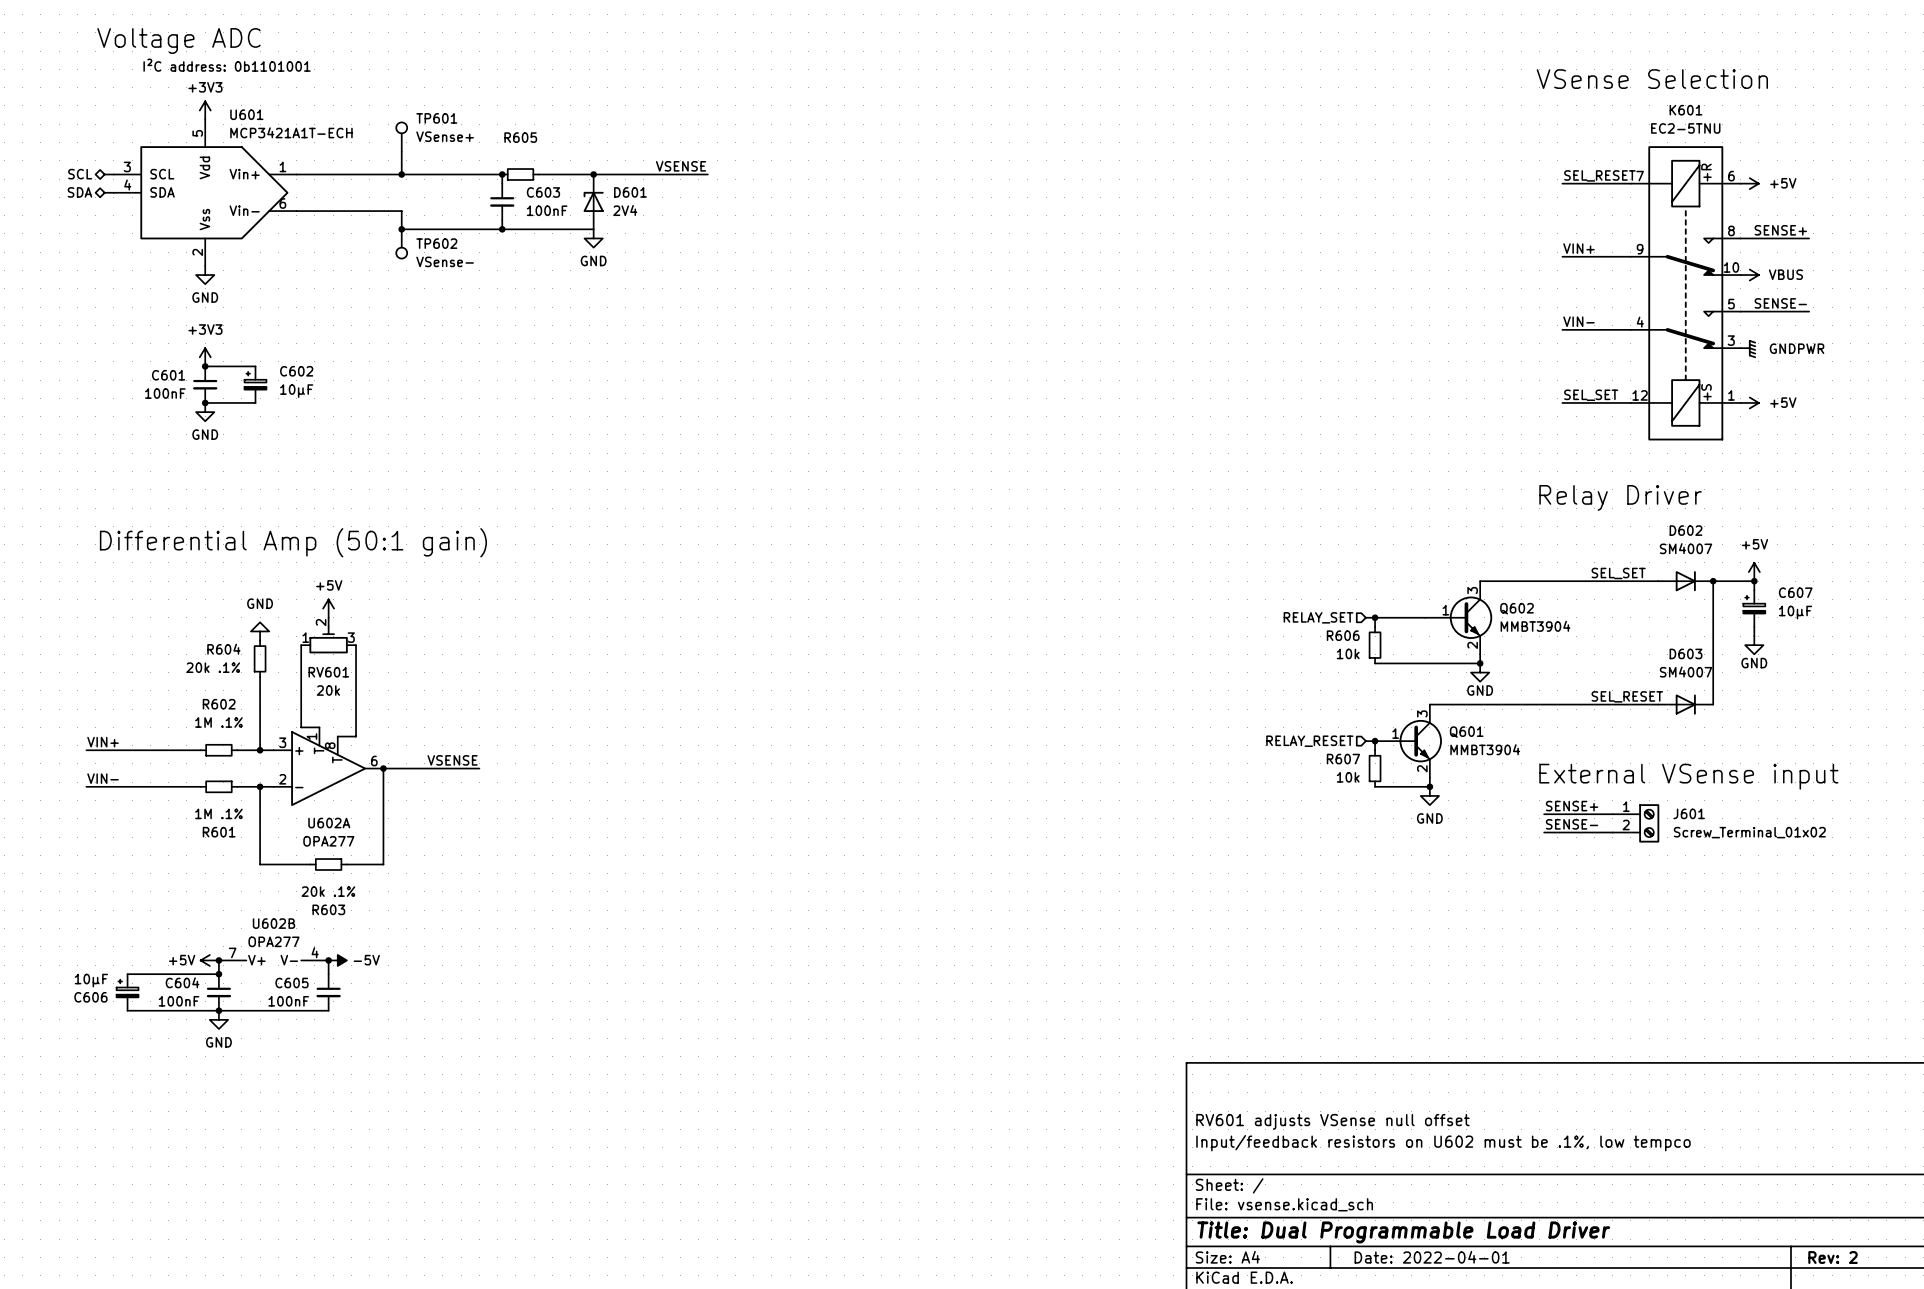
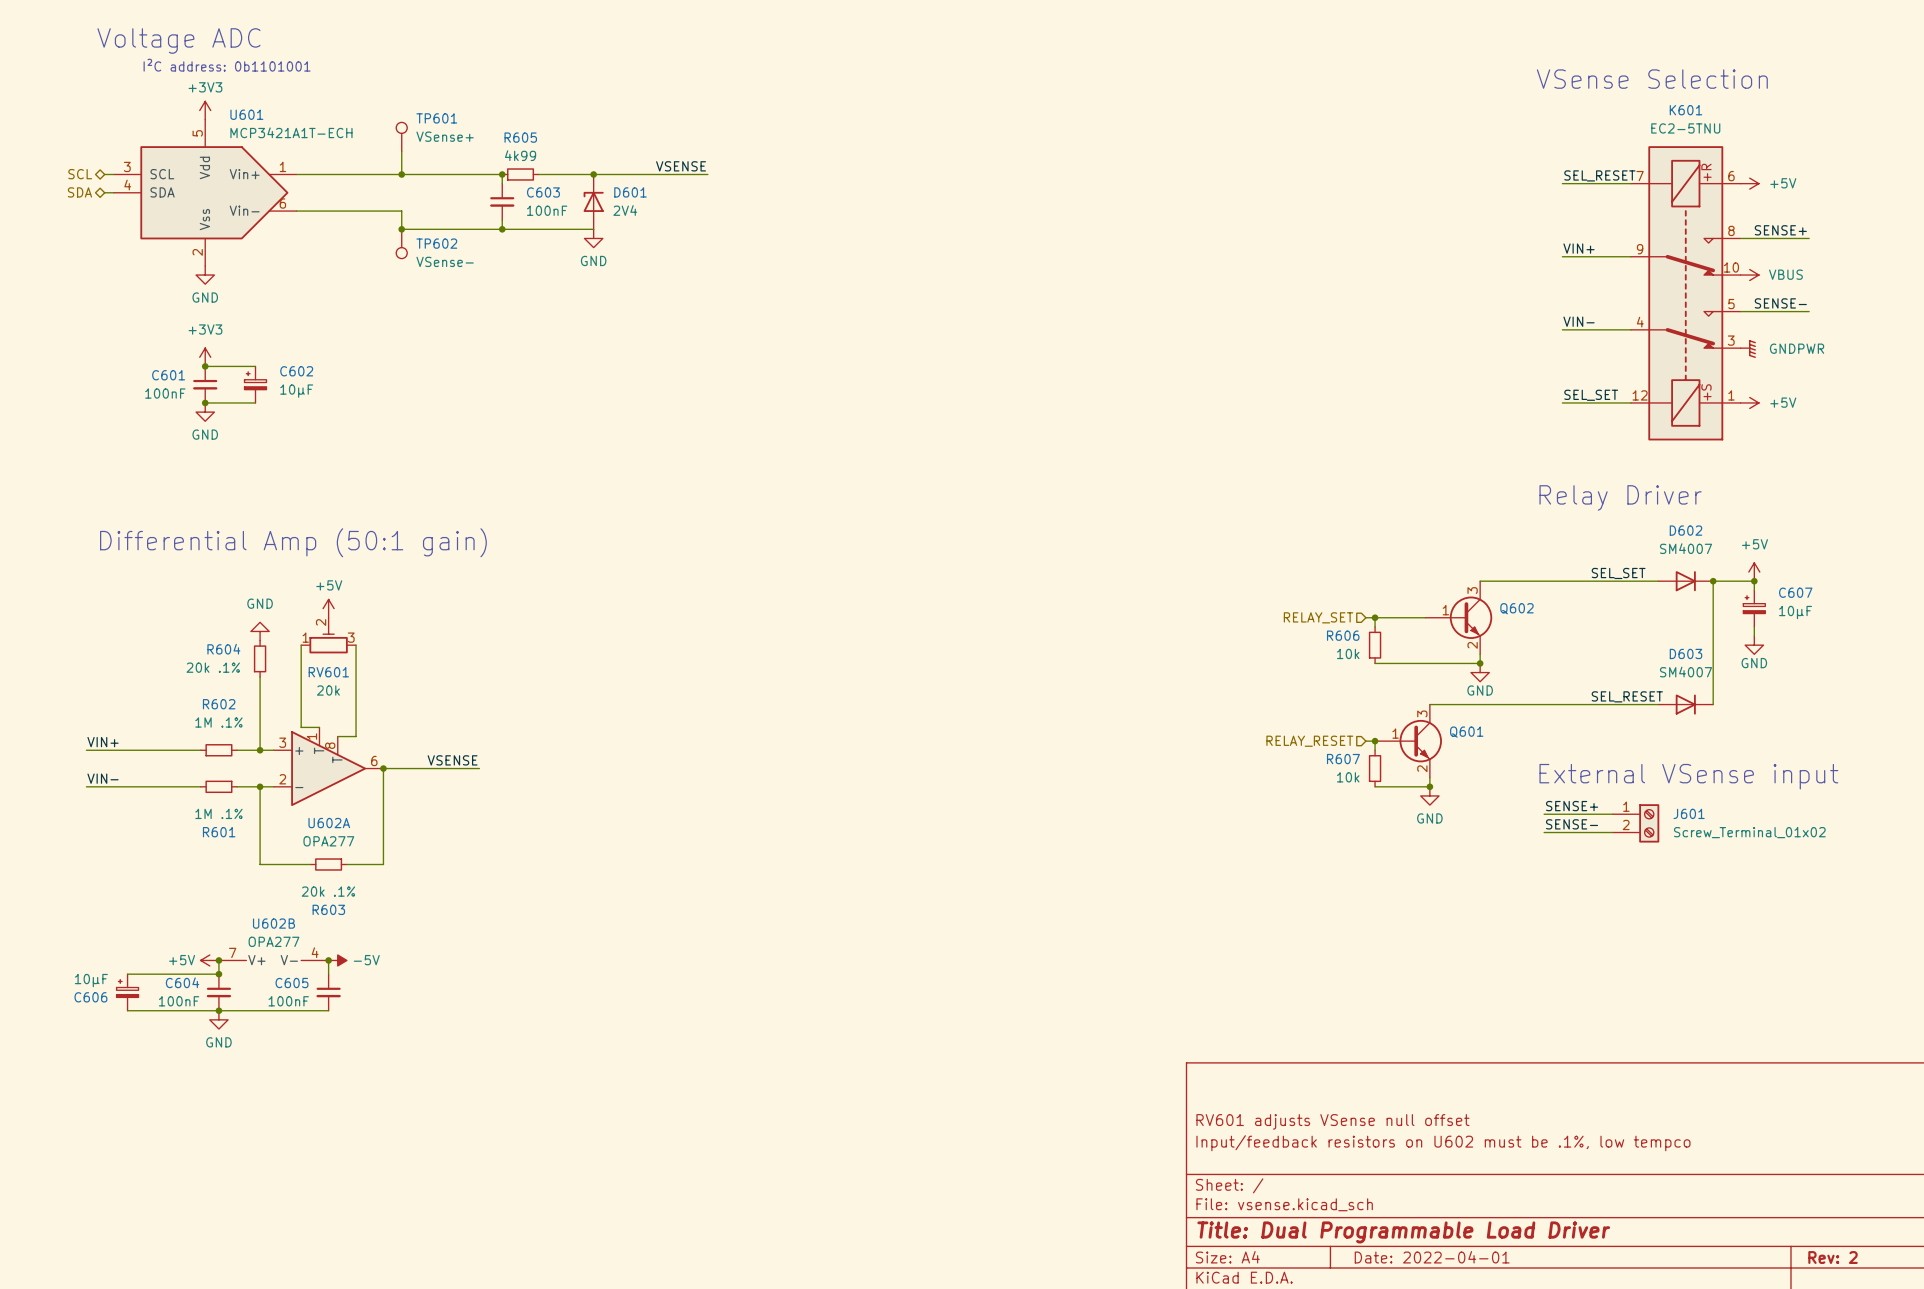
R605 value: none -> 4k99 (520, 155)
Q602 value: MMBT3904 (1535, 626) -> none
Q601 value: MMBT3904 (1485, 749) -> none

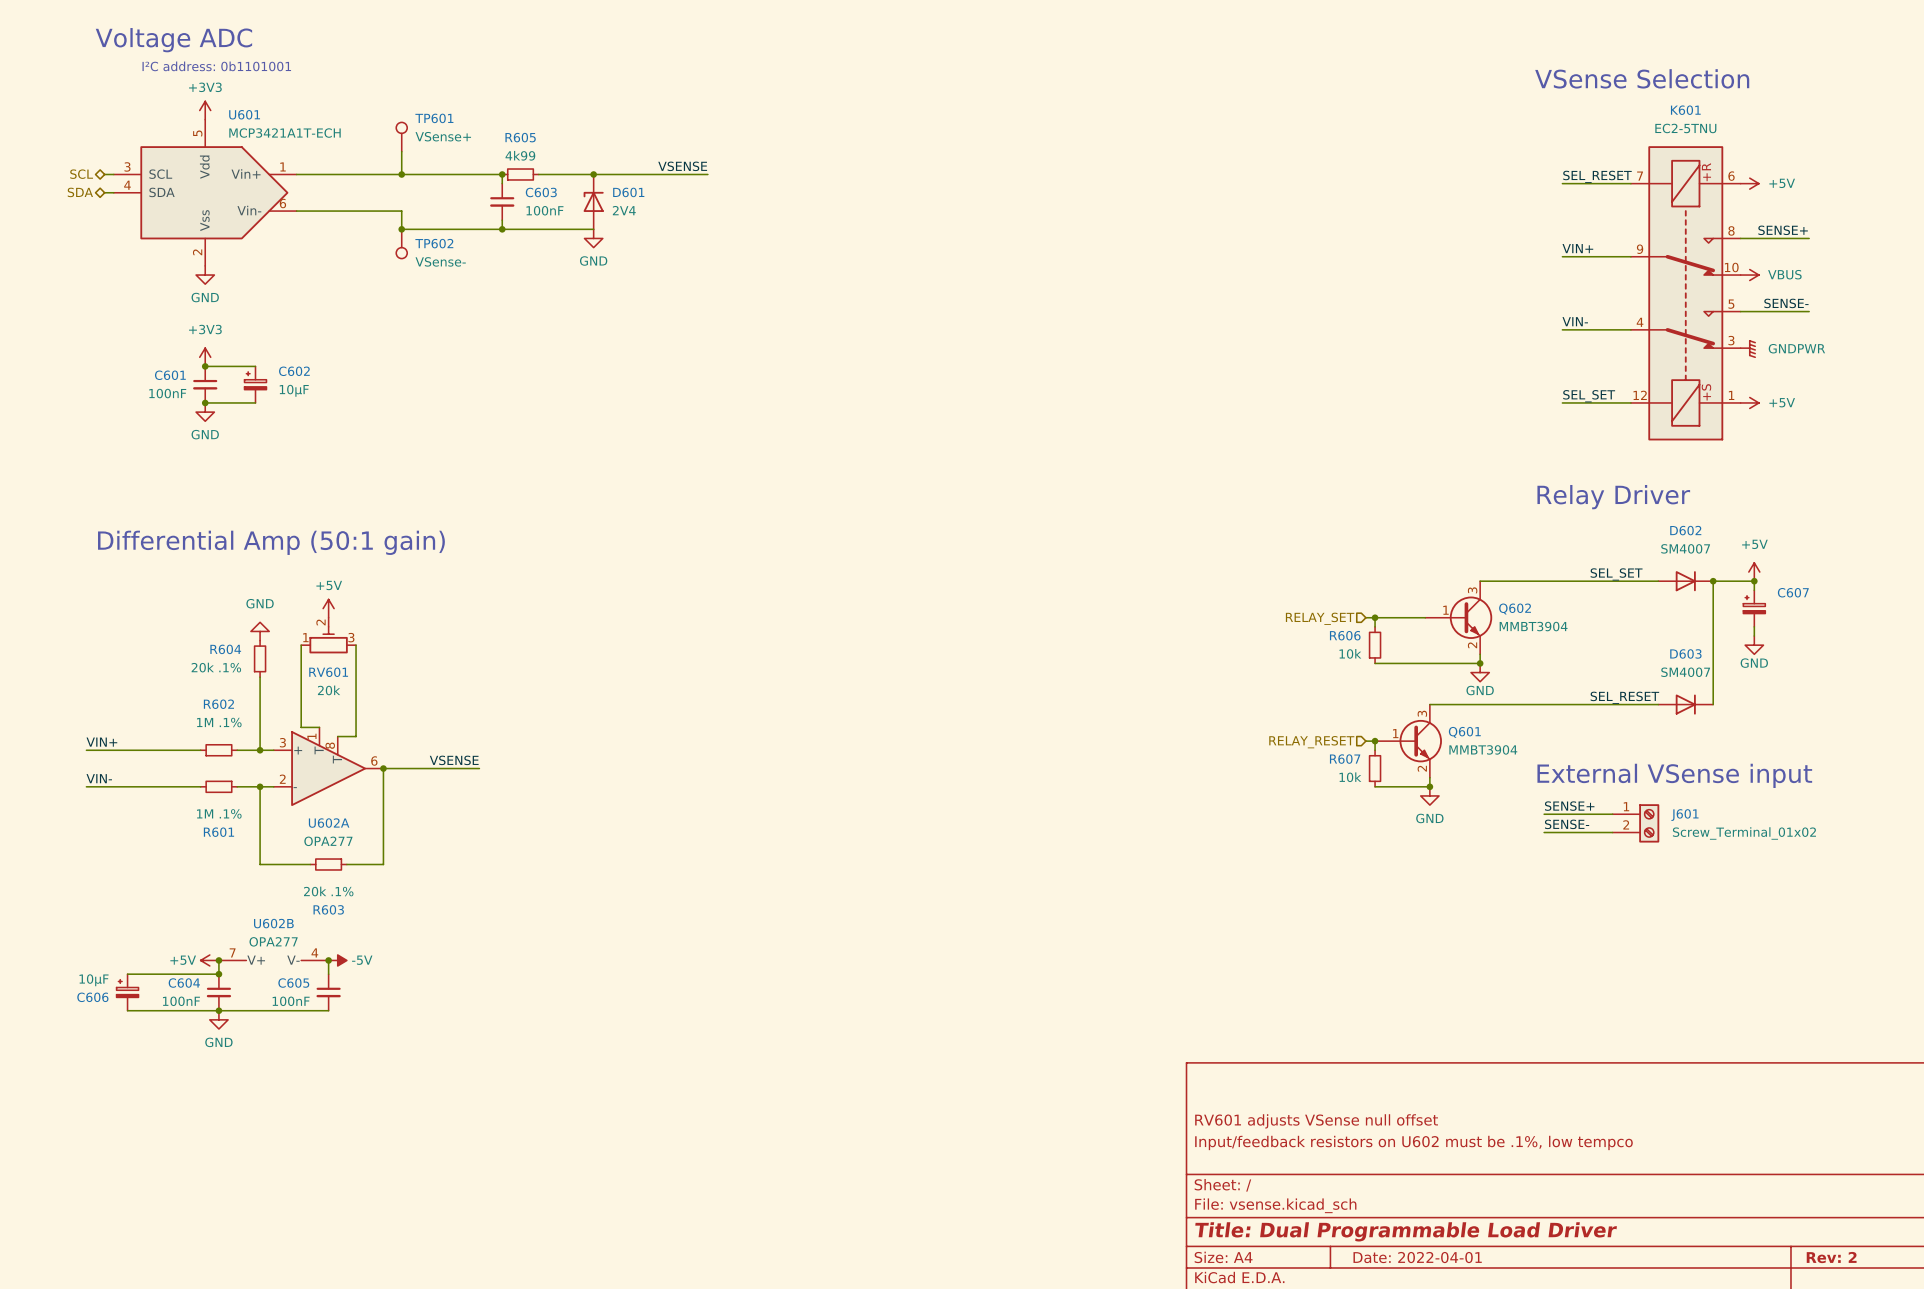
C607 value: 10µF (1795, 612) -> none
Q602 value: none -> MMBT3904 (1533, 626)
Q601 value: none -> MMBT3904 (1483, 749)

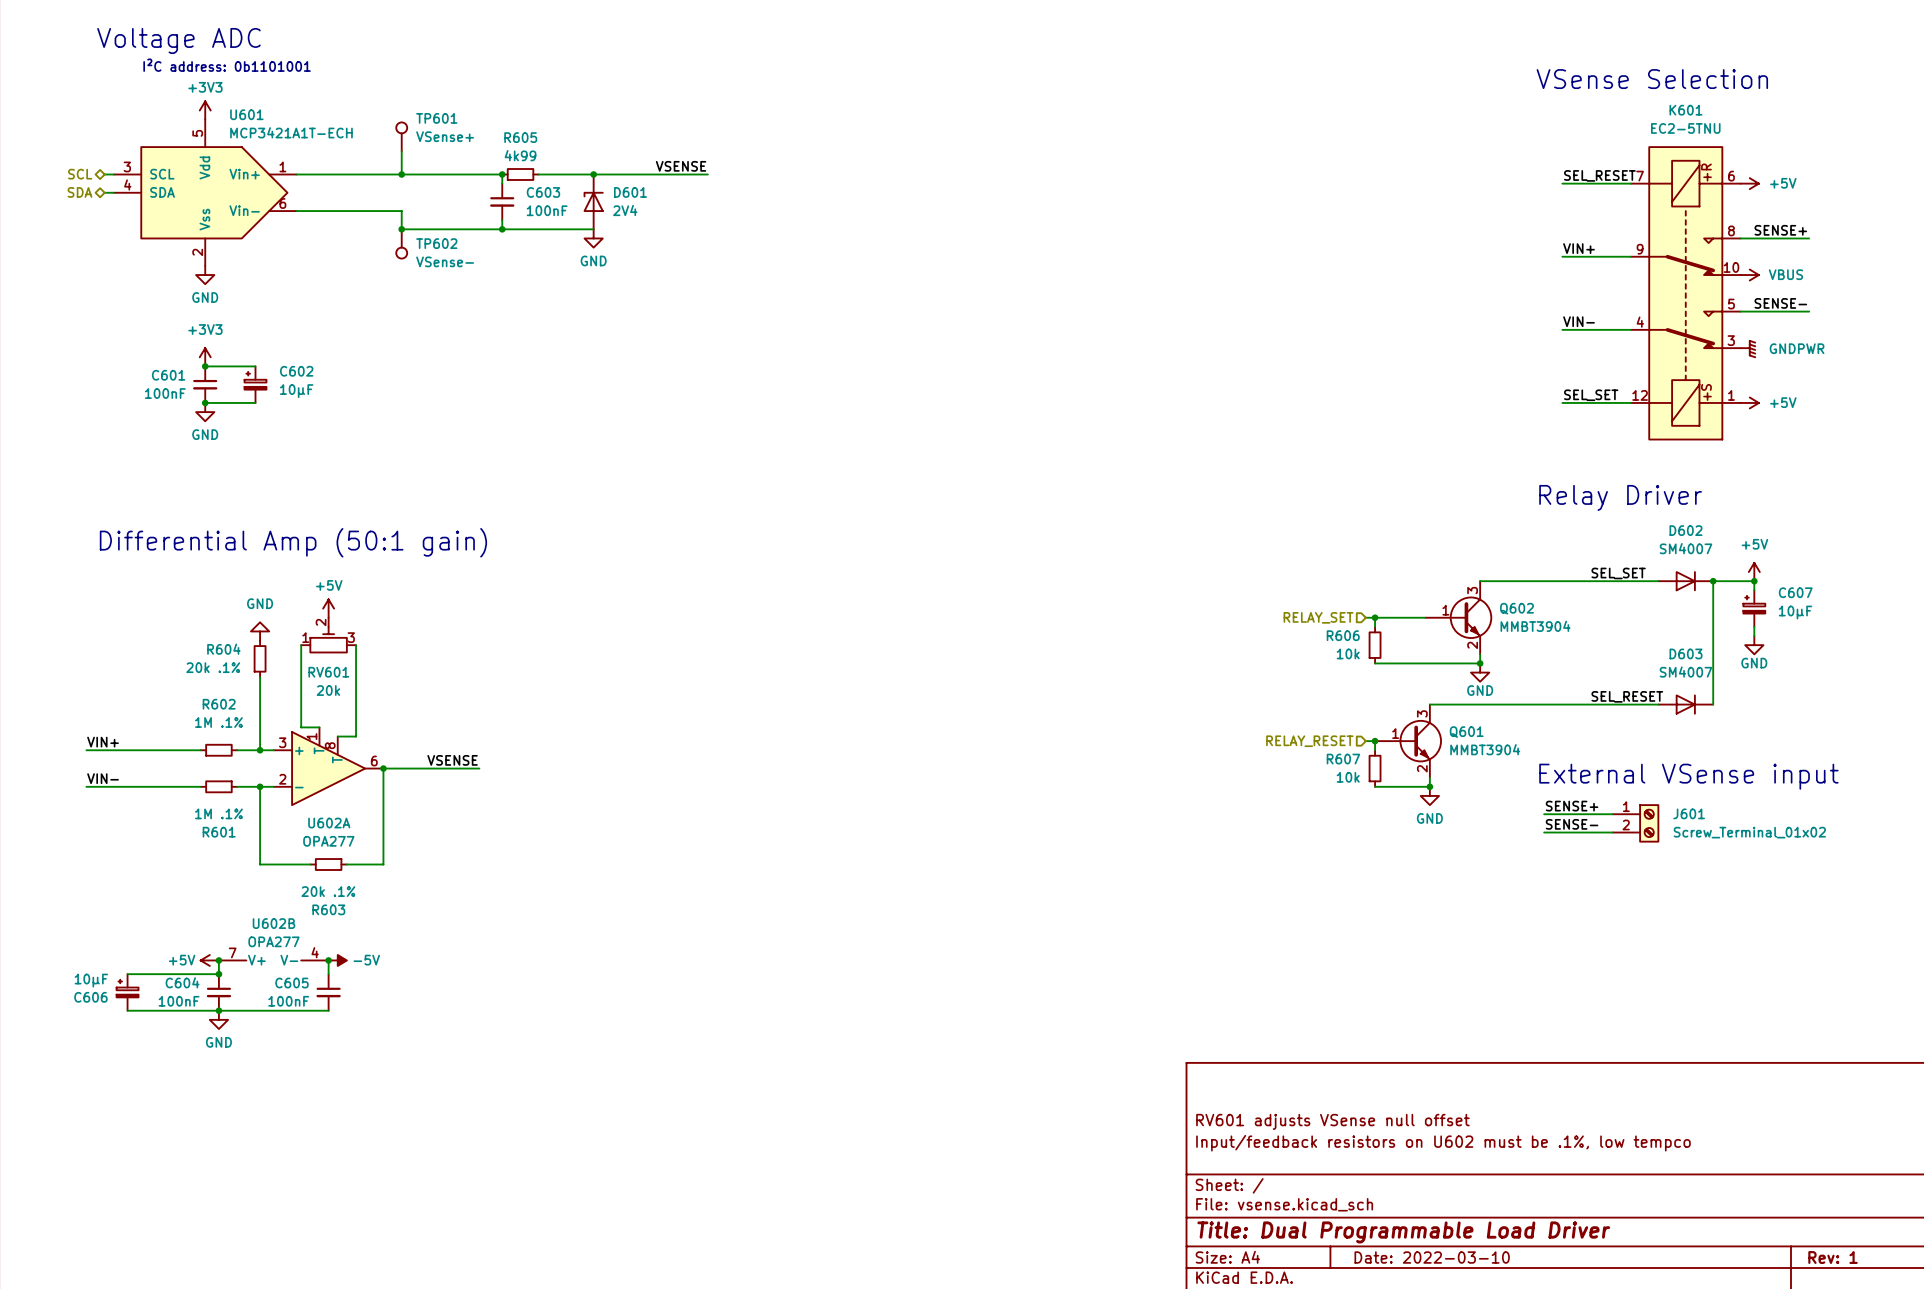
C607 value: none -> 10µF (1795, 612)
title block: Date: 2022-04-01 (1417, 1257) -> Date: 2022-03-10 (1432, 1257)
title block: Rev: 2 (1831, 1257) -> Rev: 1 (1833, 1257)

